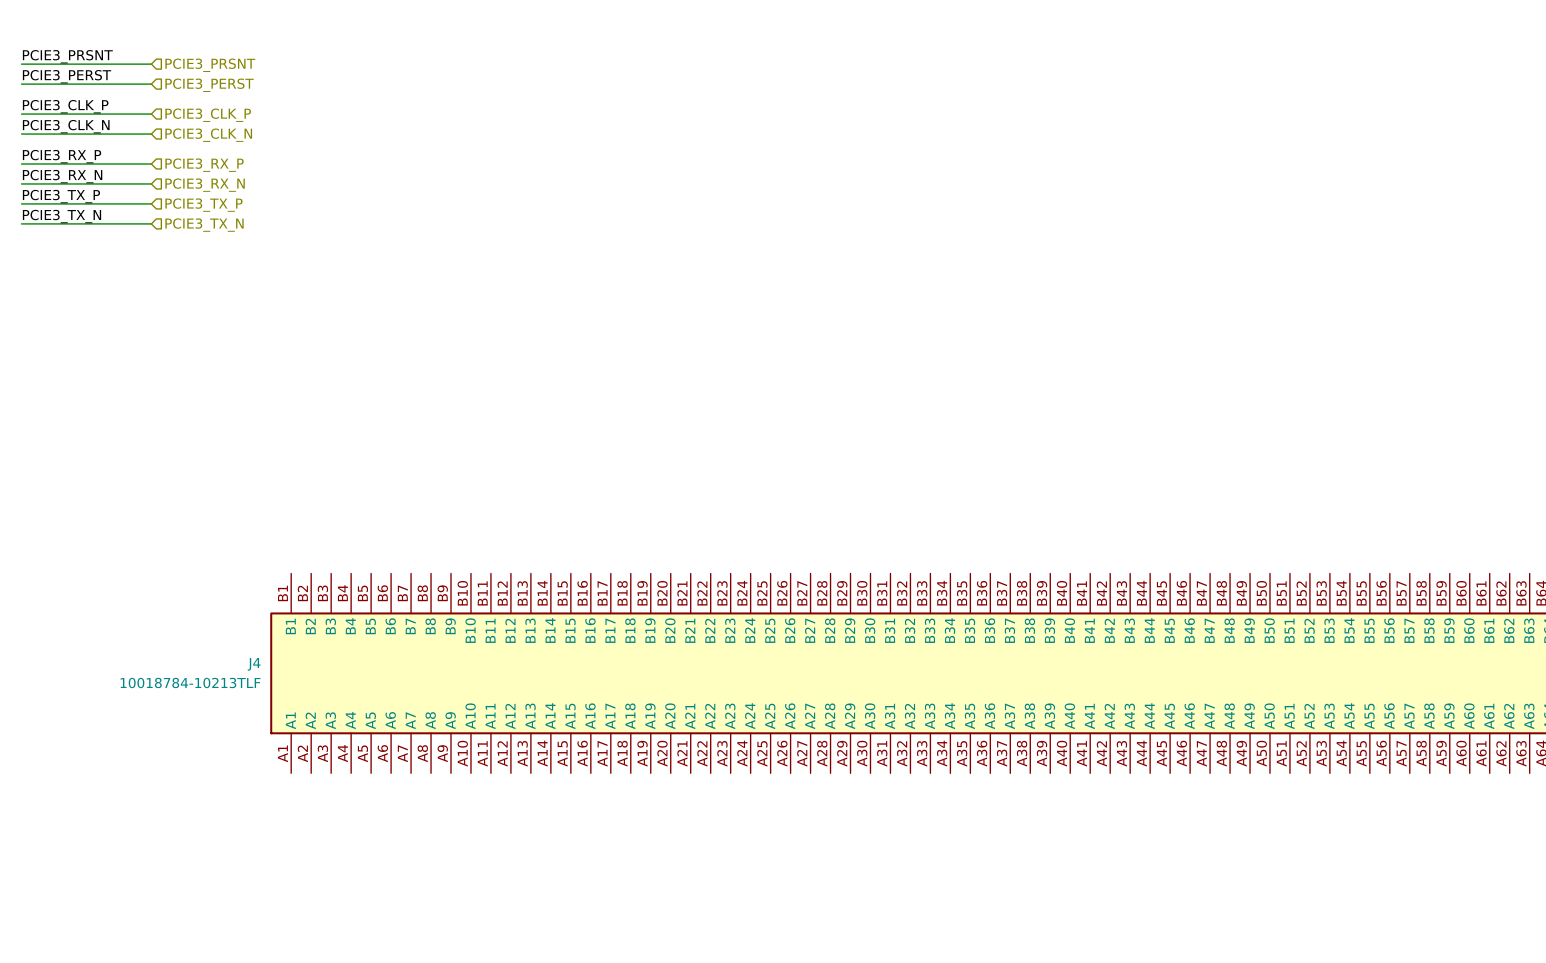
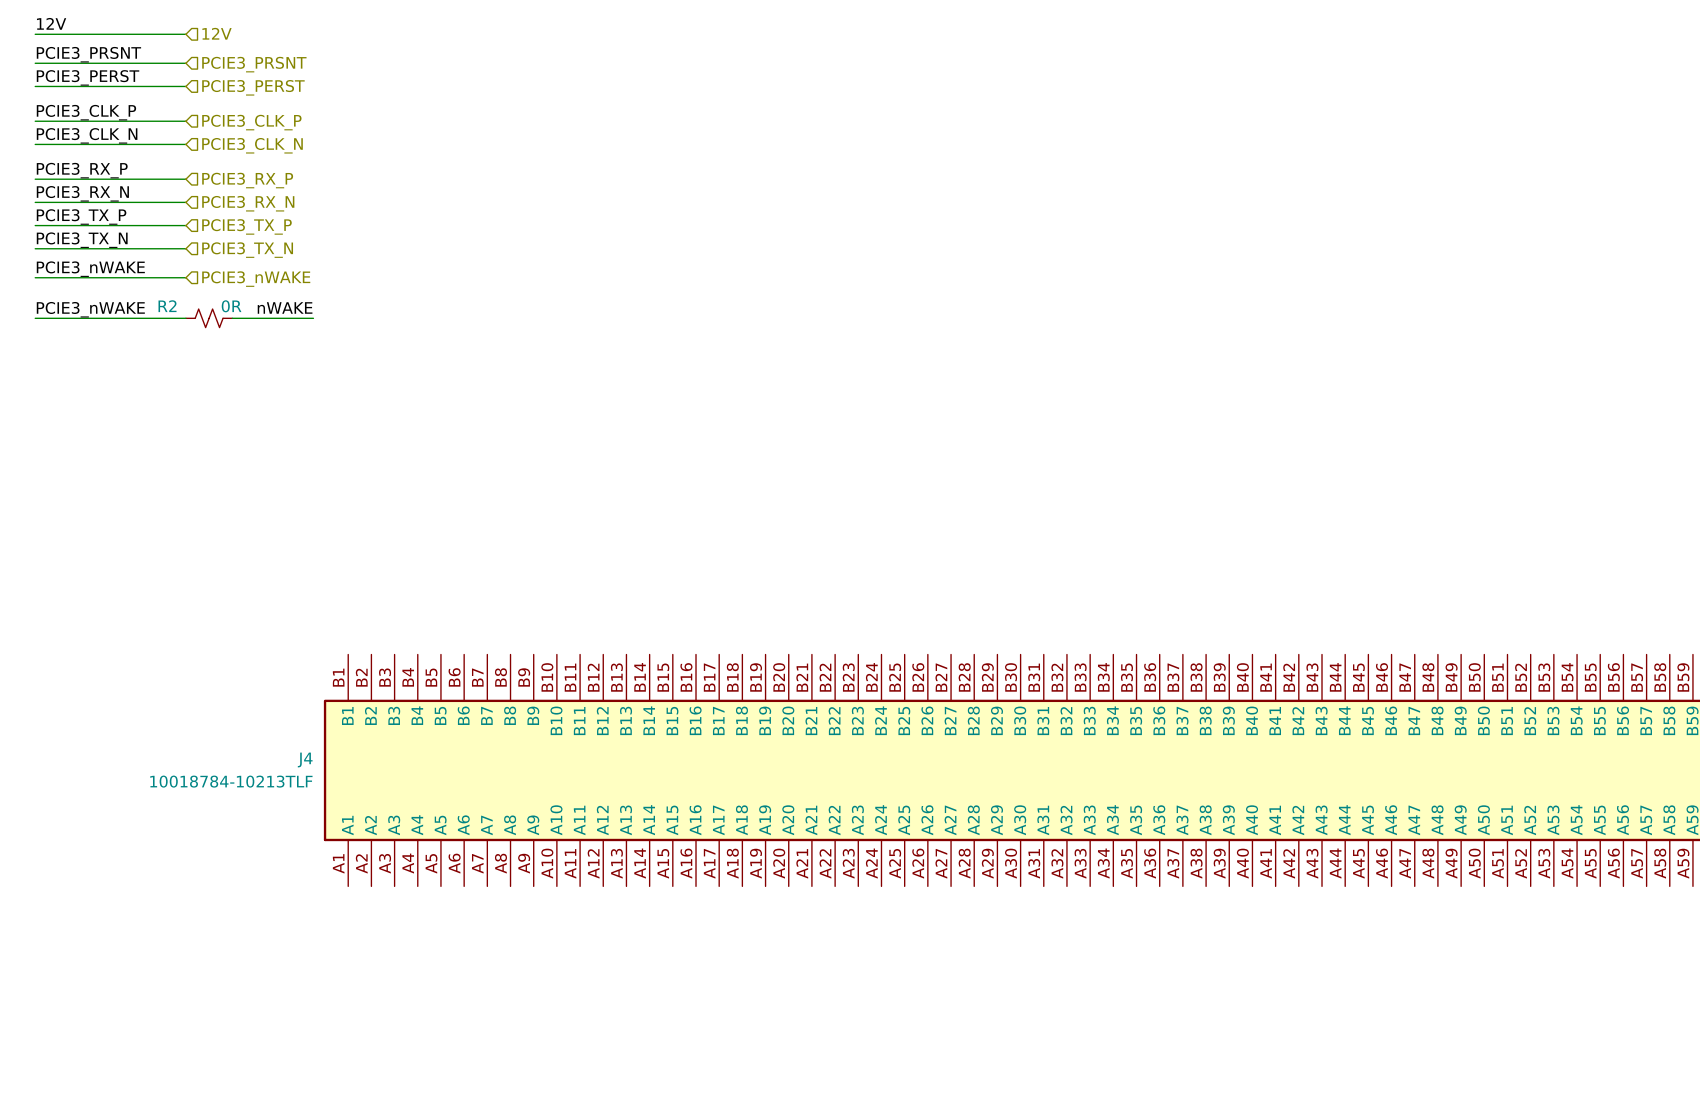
label: none -> 12V (51, 23)
hierarchical label: none -> 12V (217, 33)
wire: none -> (35, 34) (185, 34)
label: none -> PCIE3_nWAKE (90, 269)
wire: none -> (35, 277) (185, 277)
hierarchical label: none -> PCIE3_nWAKE (256, 279)
label: none -> nWAKE (285, 307)
label: none -> PCIE3_nWAKE (90, 309)
wire: none -> (35, 318) (185, 318)
R2: none -> 0R (209, 318)
wire: none -> (232, 318) (313, 318)

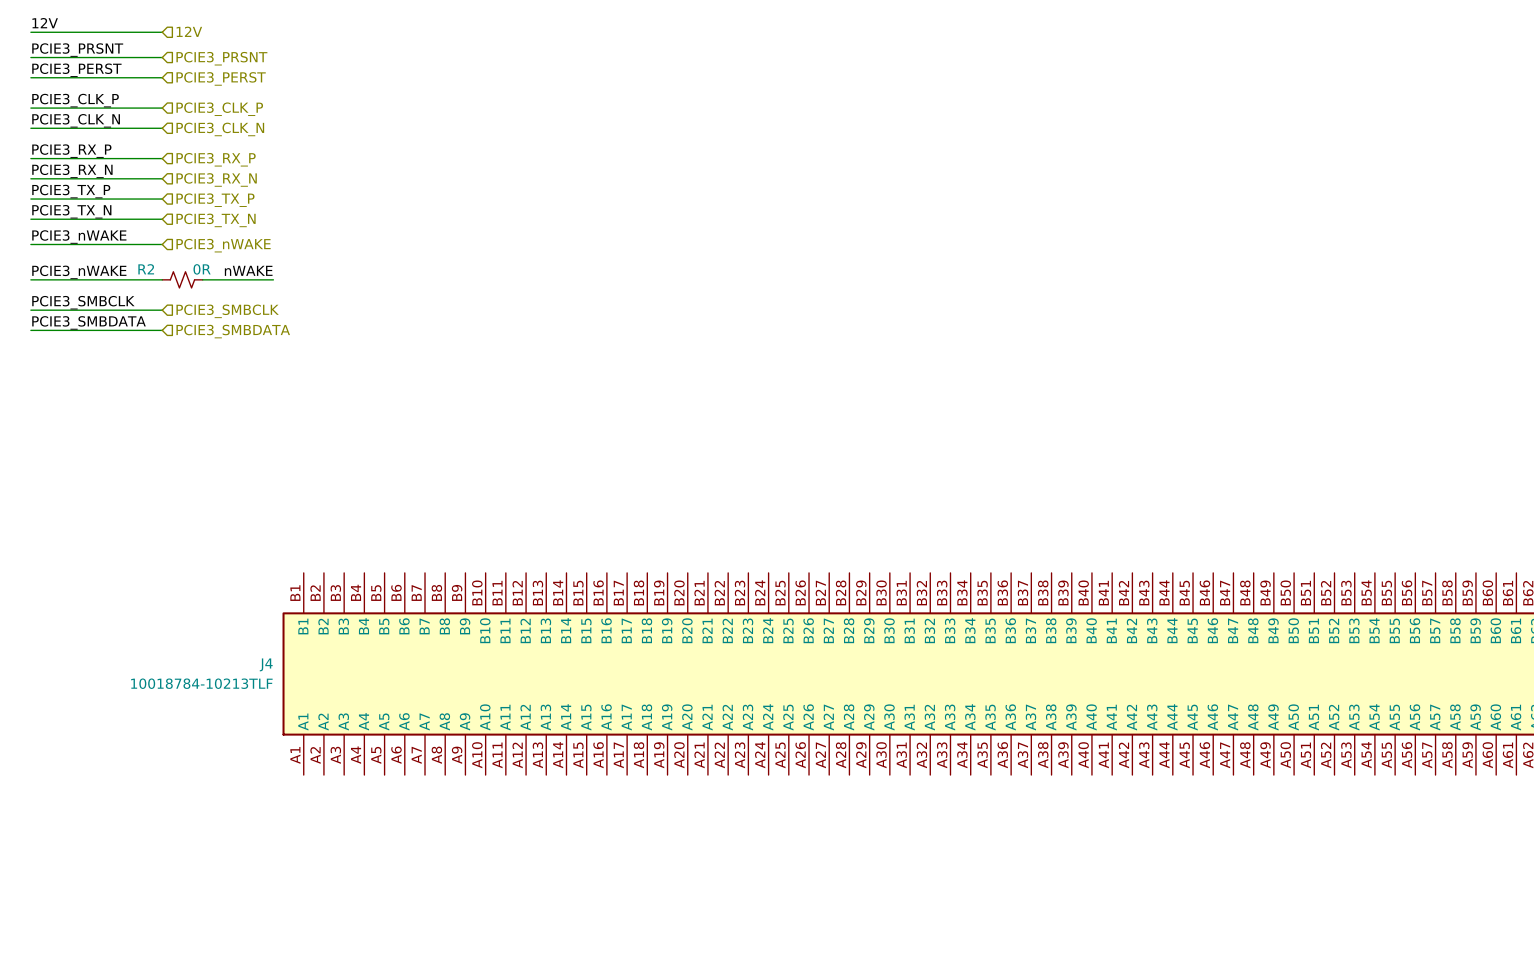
label: none -> PCIE3_SMBCLK (83, 302)
wire: none -> (30, 310) (162, 310)
hierarchical label: none -> PCIE3_SMBCLK (227, 311)
label: none -> PCIE3_SMBDATA (89, 322)
wire: none -> (30, 330) (162, 330)
hierarchical label: none -> PCIE3_SMBDATA (233, 331)

